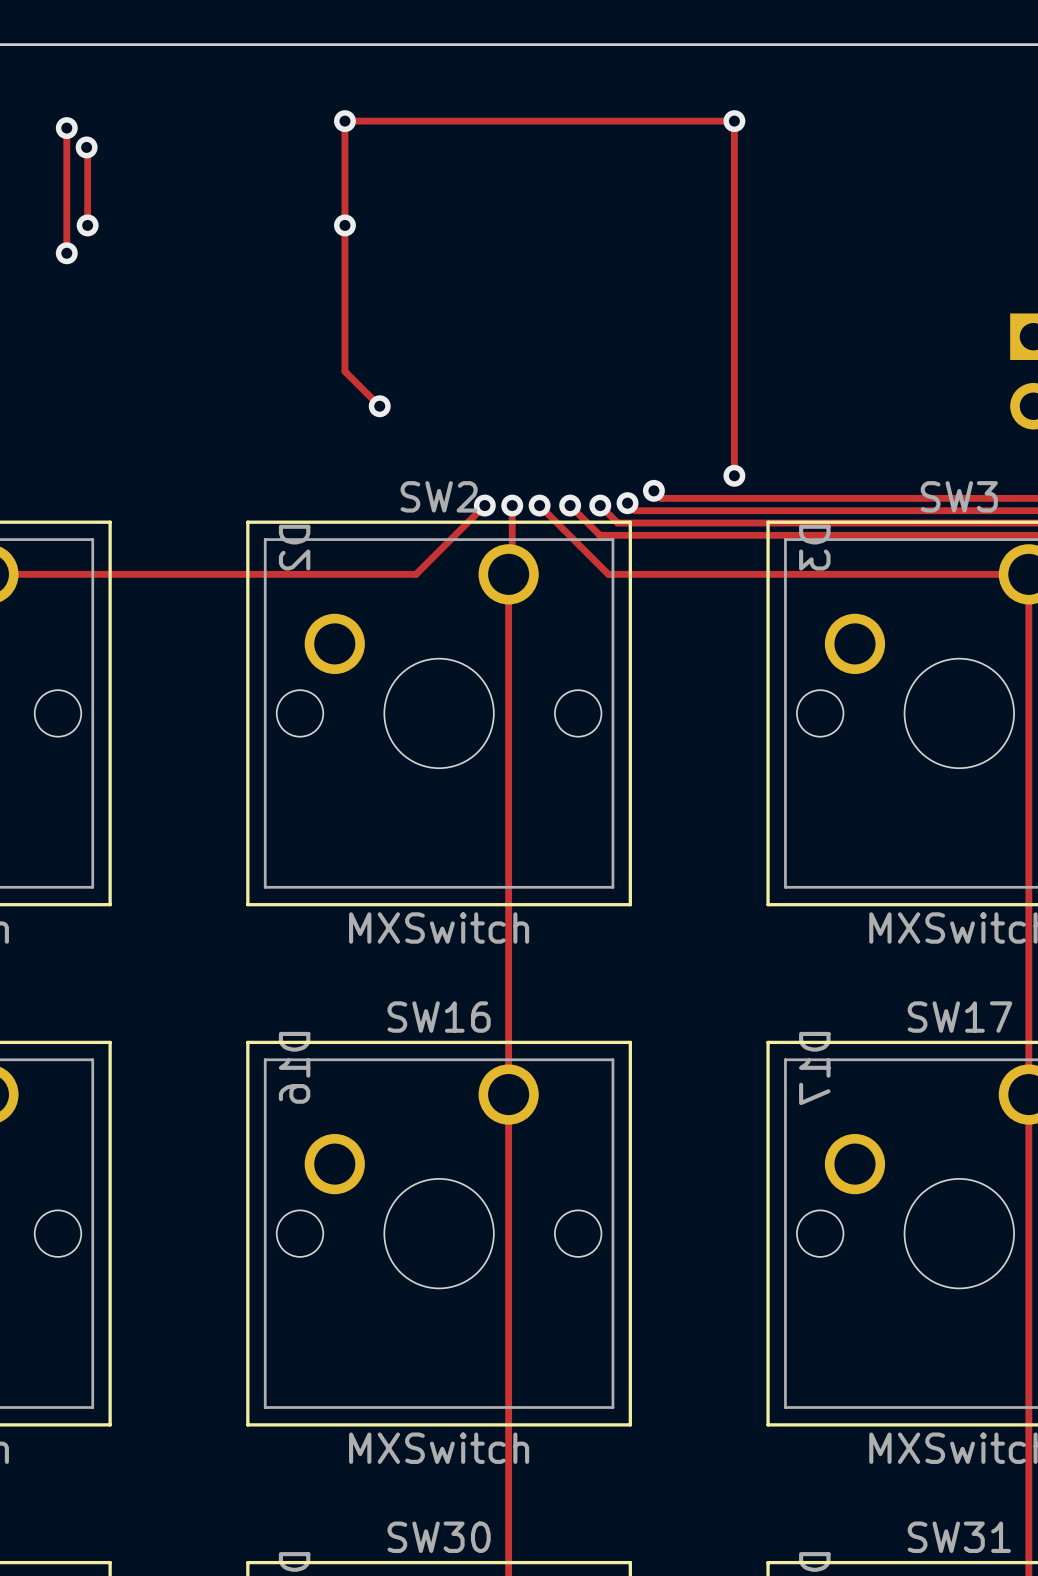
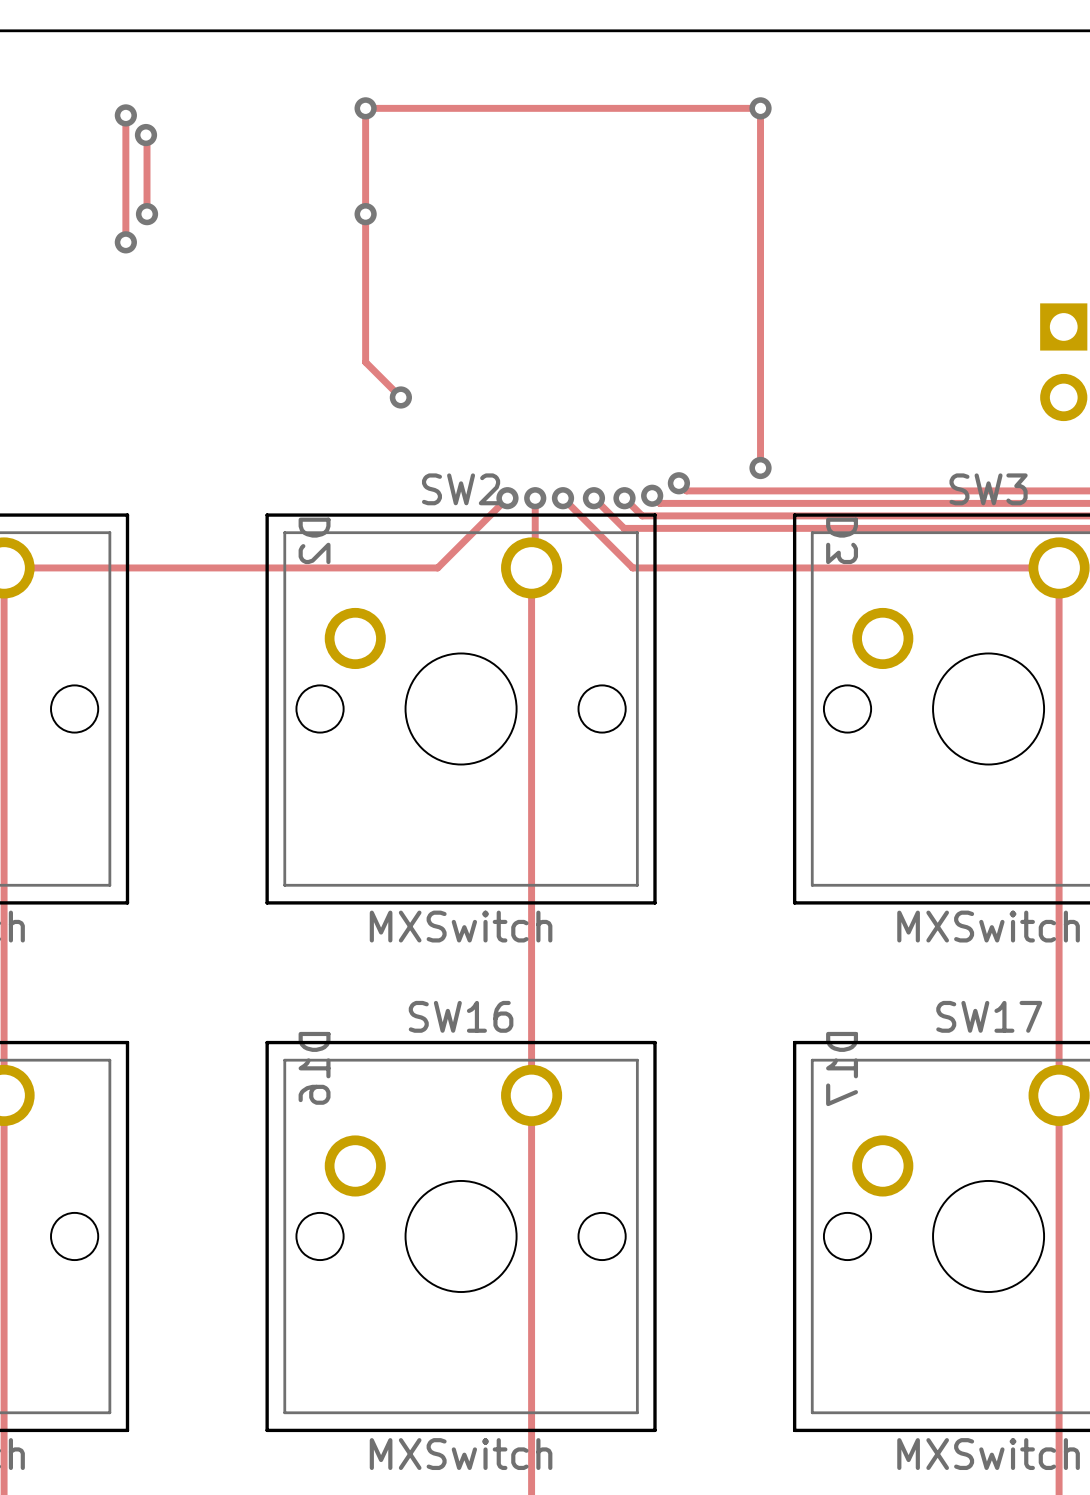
track: (66, 128) (66, 253) -> (125, 115) (125, 242)
via: (66, 128) -> none
via: none -> (125, 115)
track: (86, 147) (87, 225) -> (145, 135) (147, 214)
via: (86, 147) -> none
via: none -> (145, 135)
via: (87, 225) -> none
via: none -> (147, 214)
via: (66, 253) -> none
via: none -> (125, 242)

